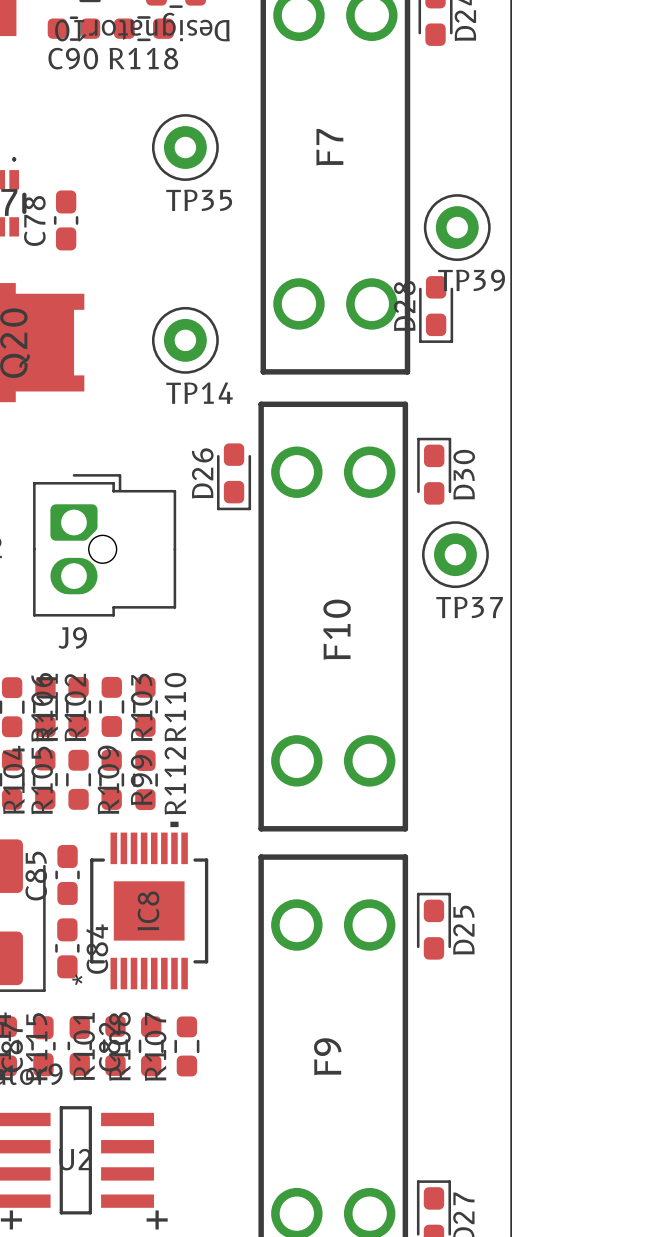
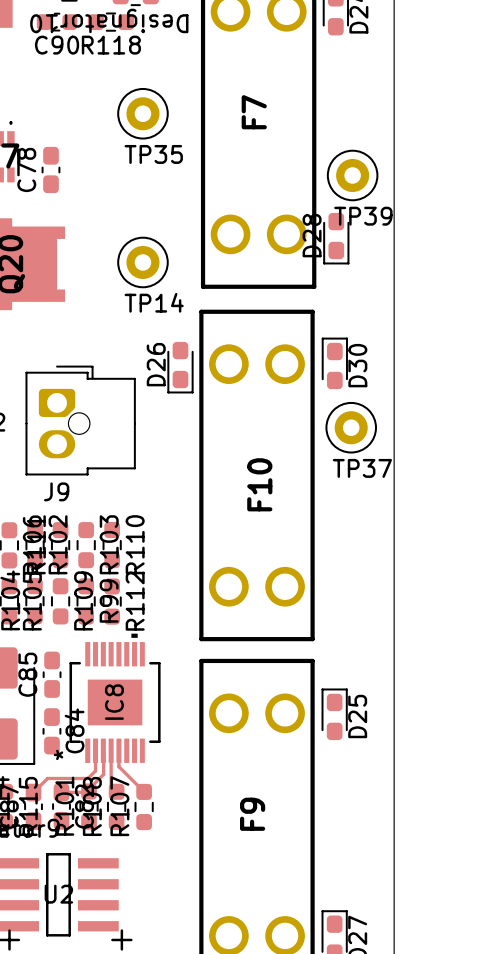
track: none -> (95, 750) (95, 770) (87, 778) (47, 778) (33, 792)
track: none -> (103, 750) (103, 774) (89, 789) (88, 792) (61, 792)
track: none -> (111, 750) (111, 786) (116, 791)
track: none -> (118, 750) (118, 766) (144, 791)

